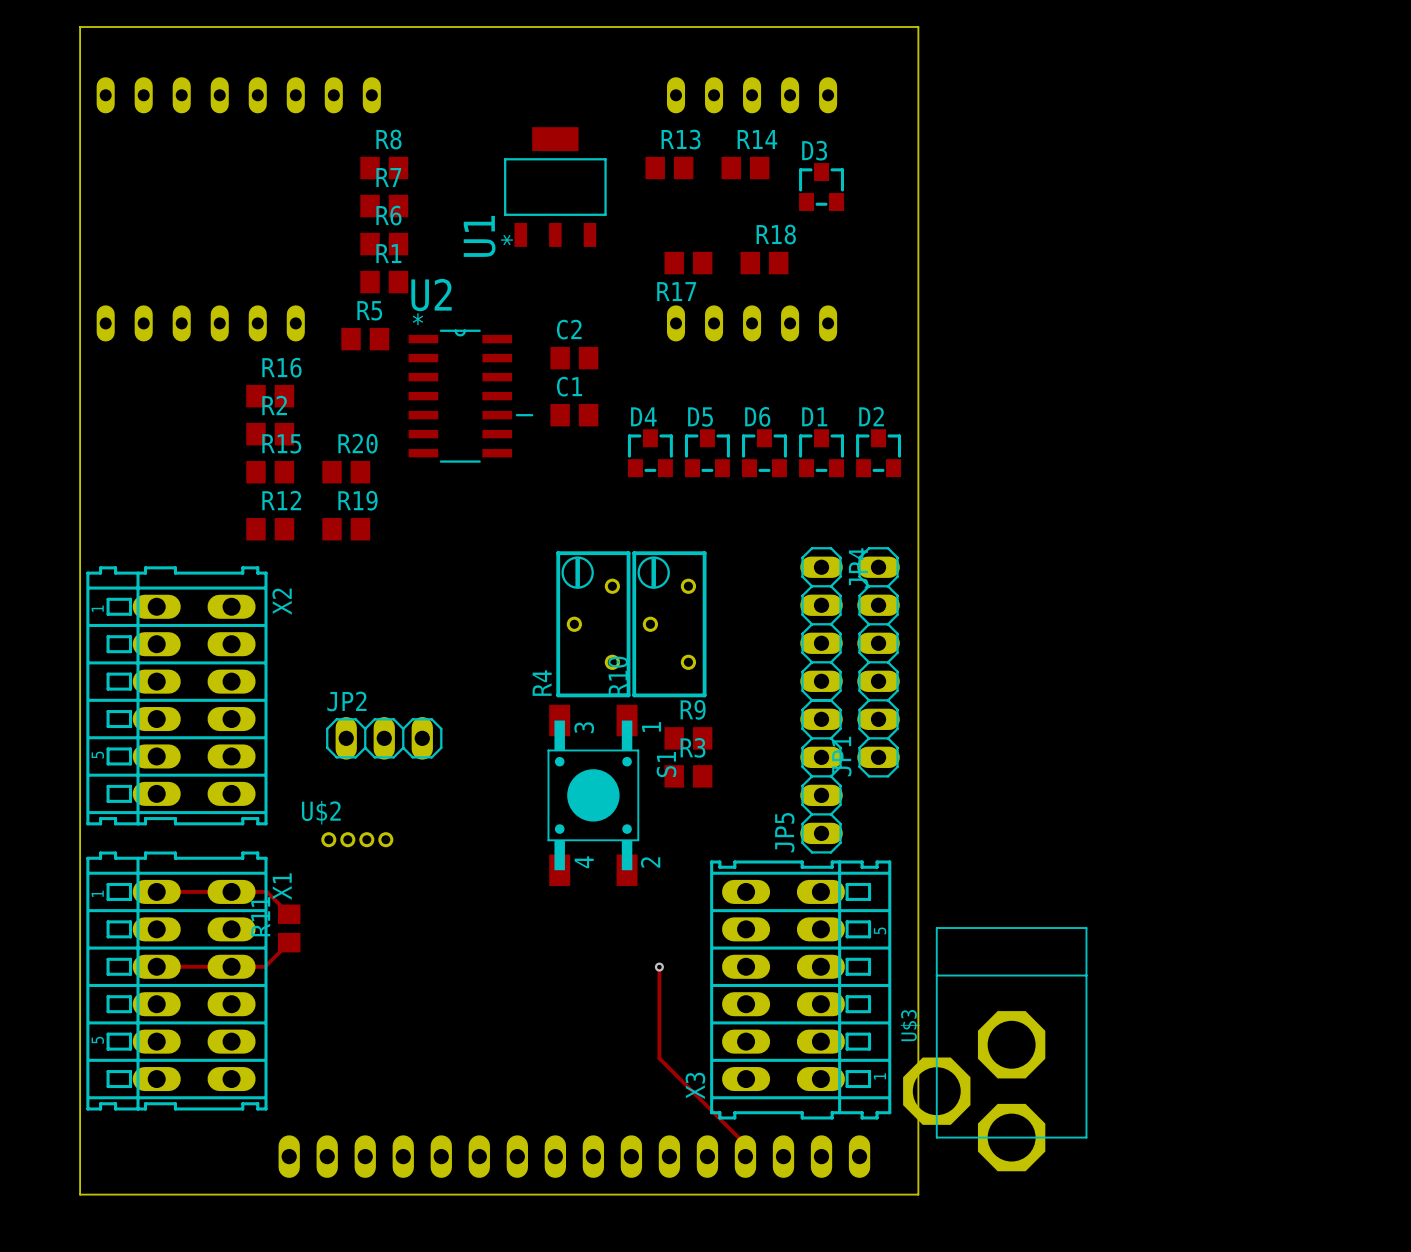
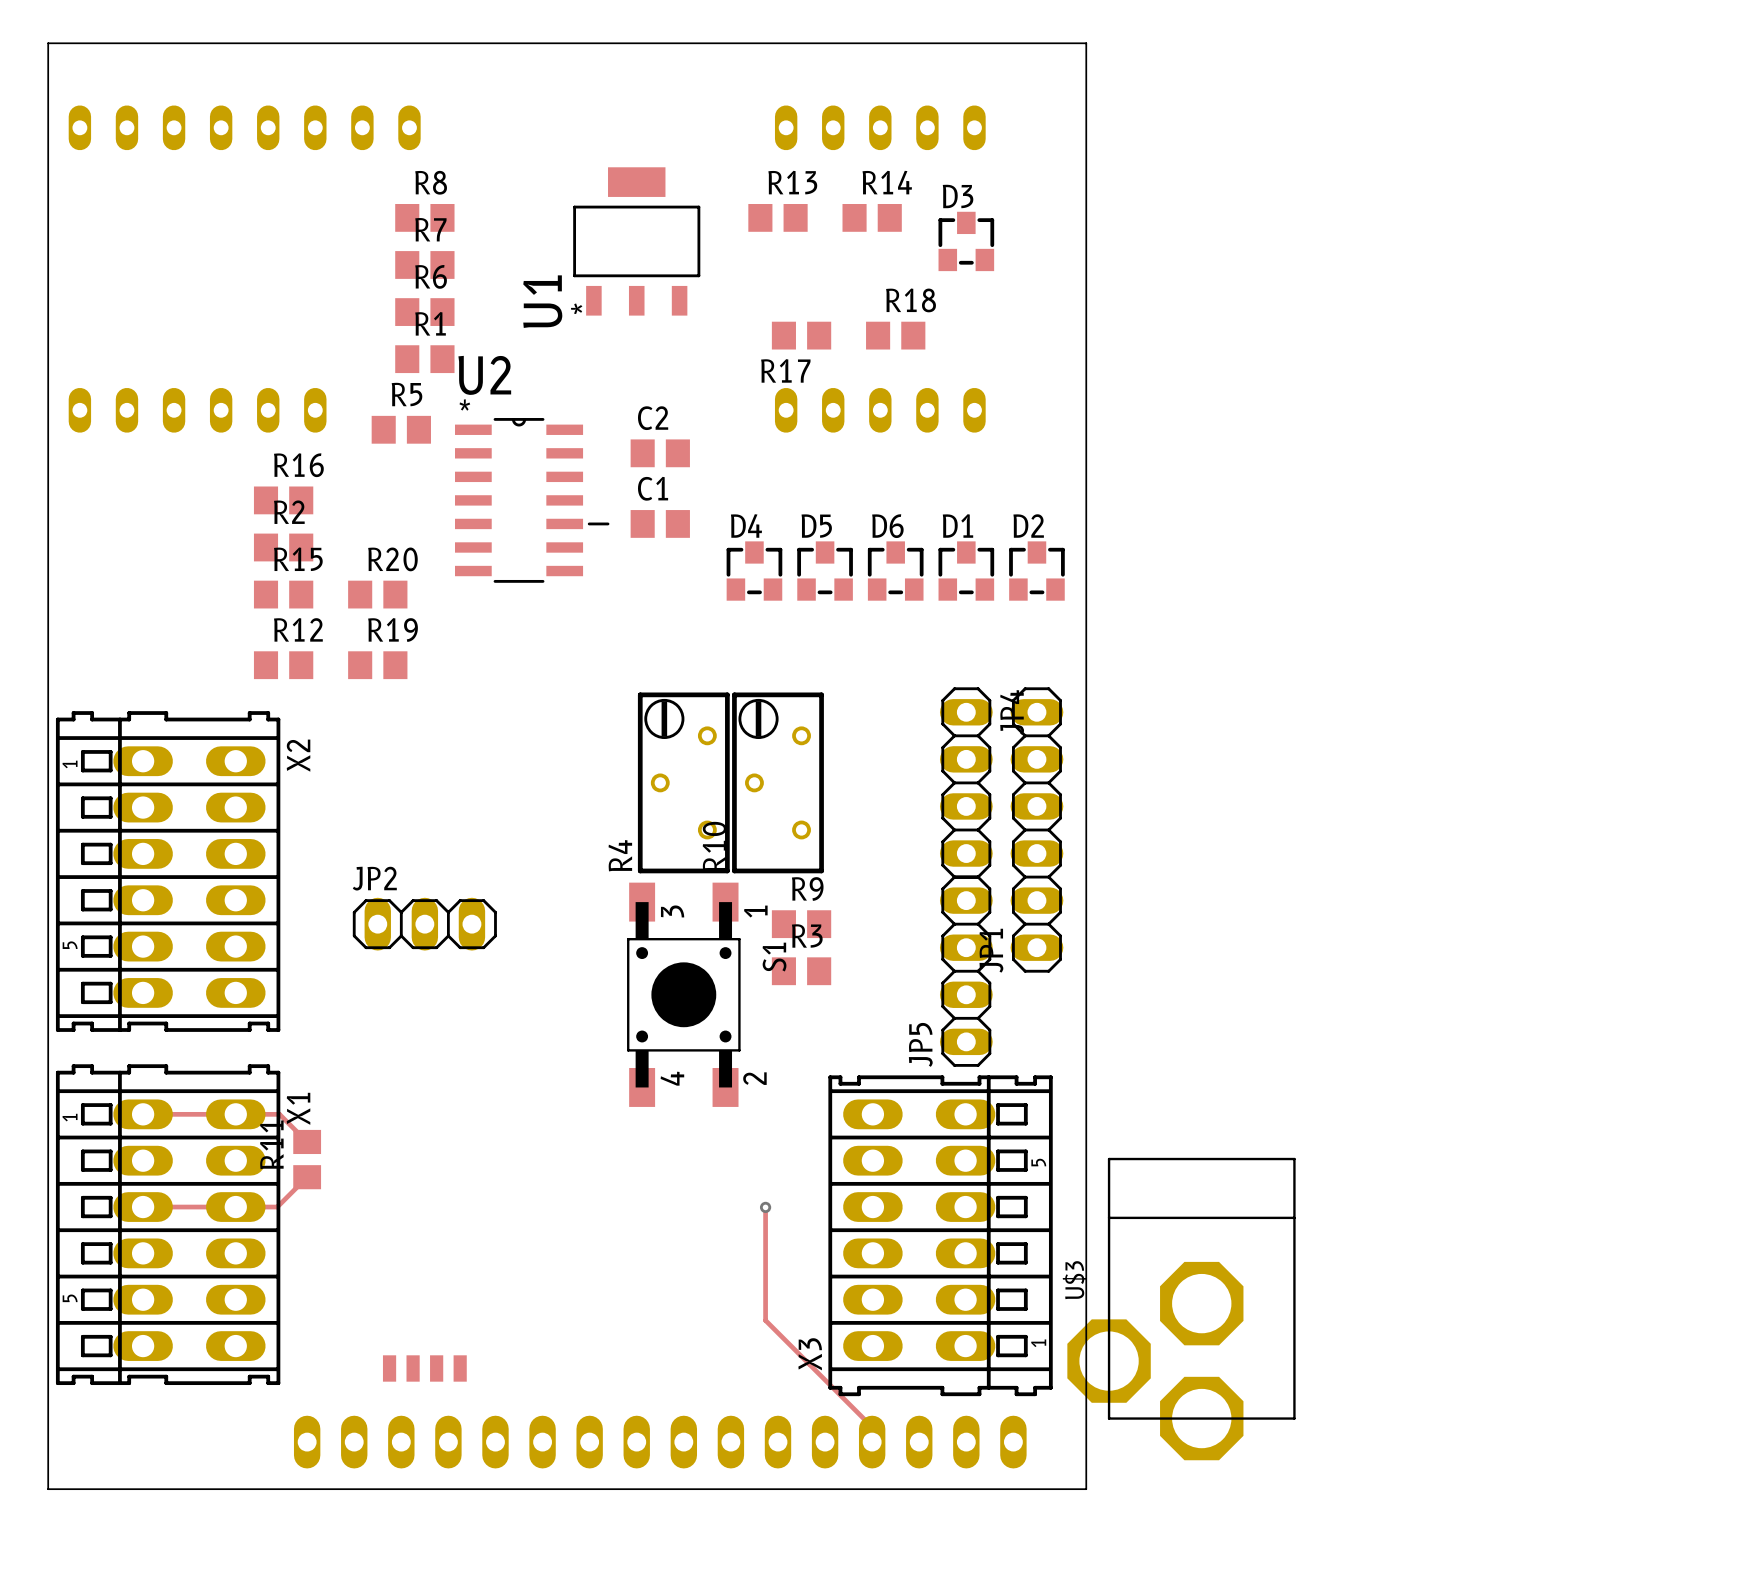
U$2: (357, 839) -> none
part: none -> (424, 1368)

